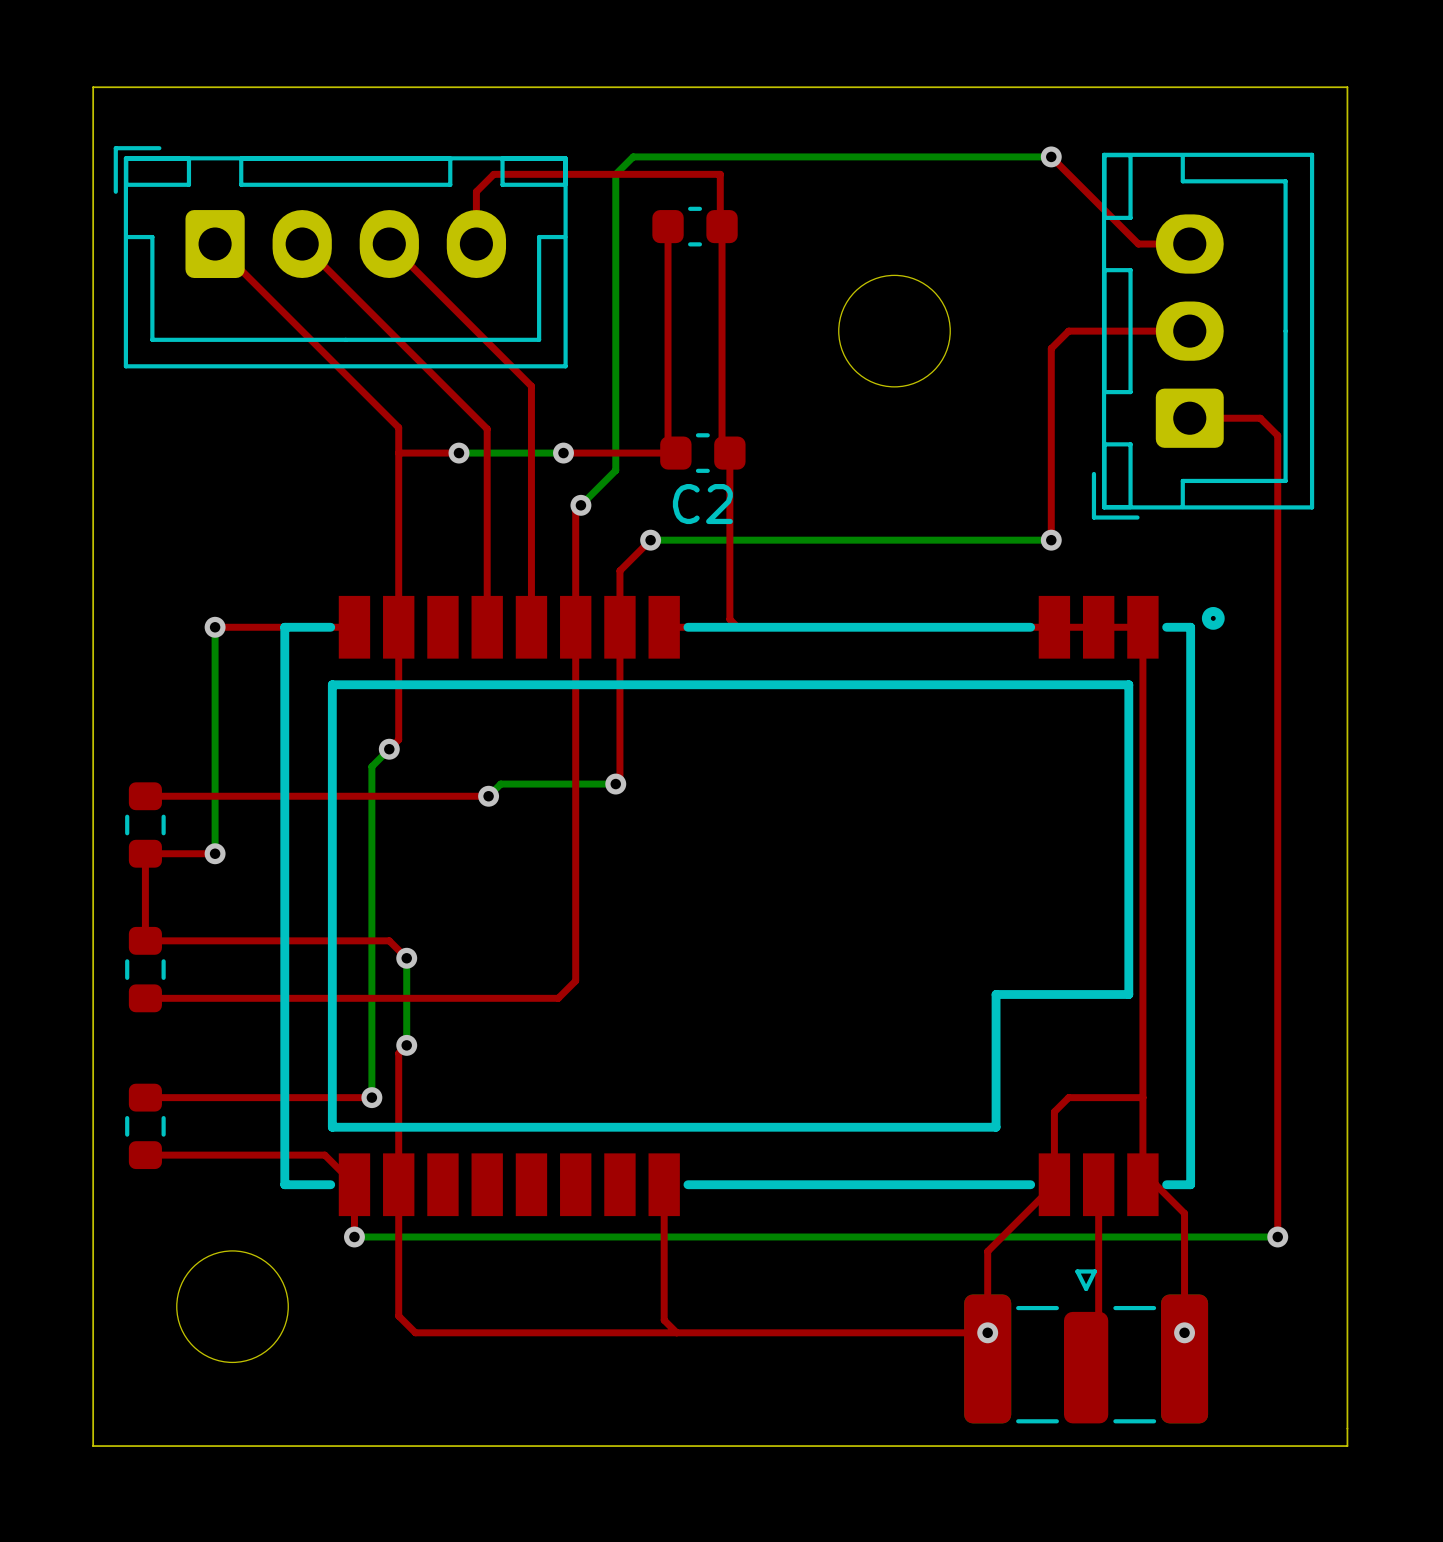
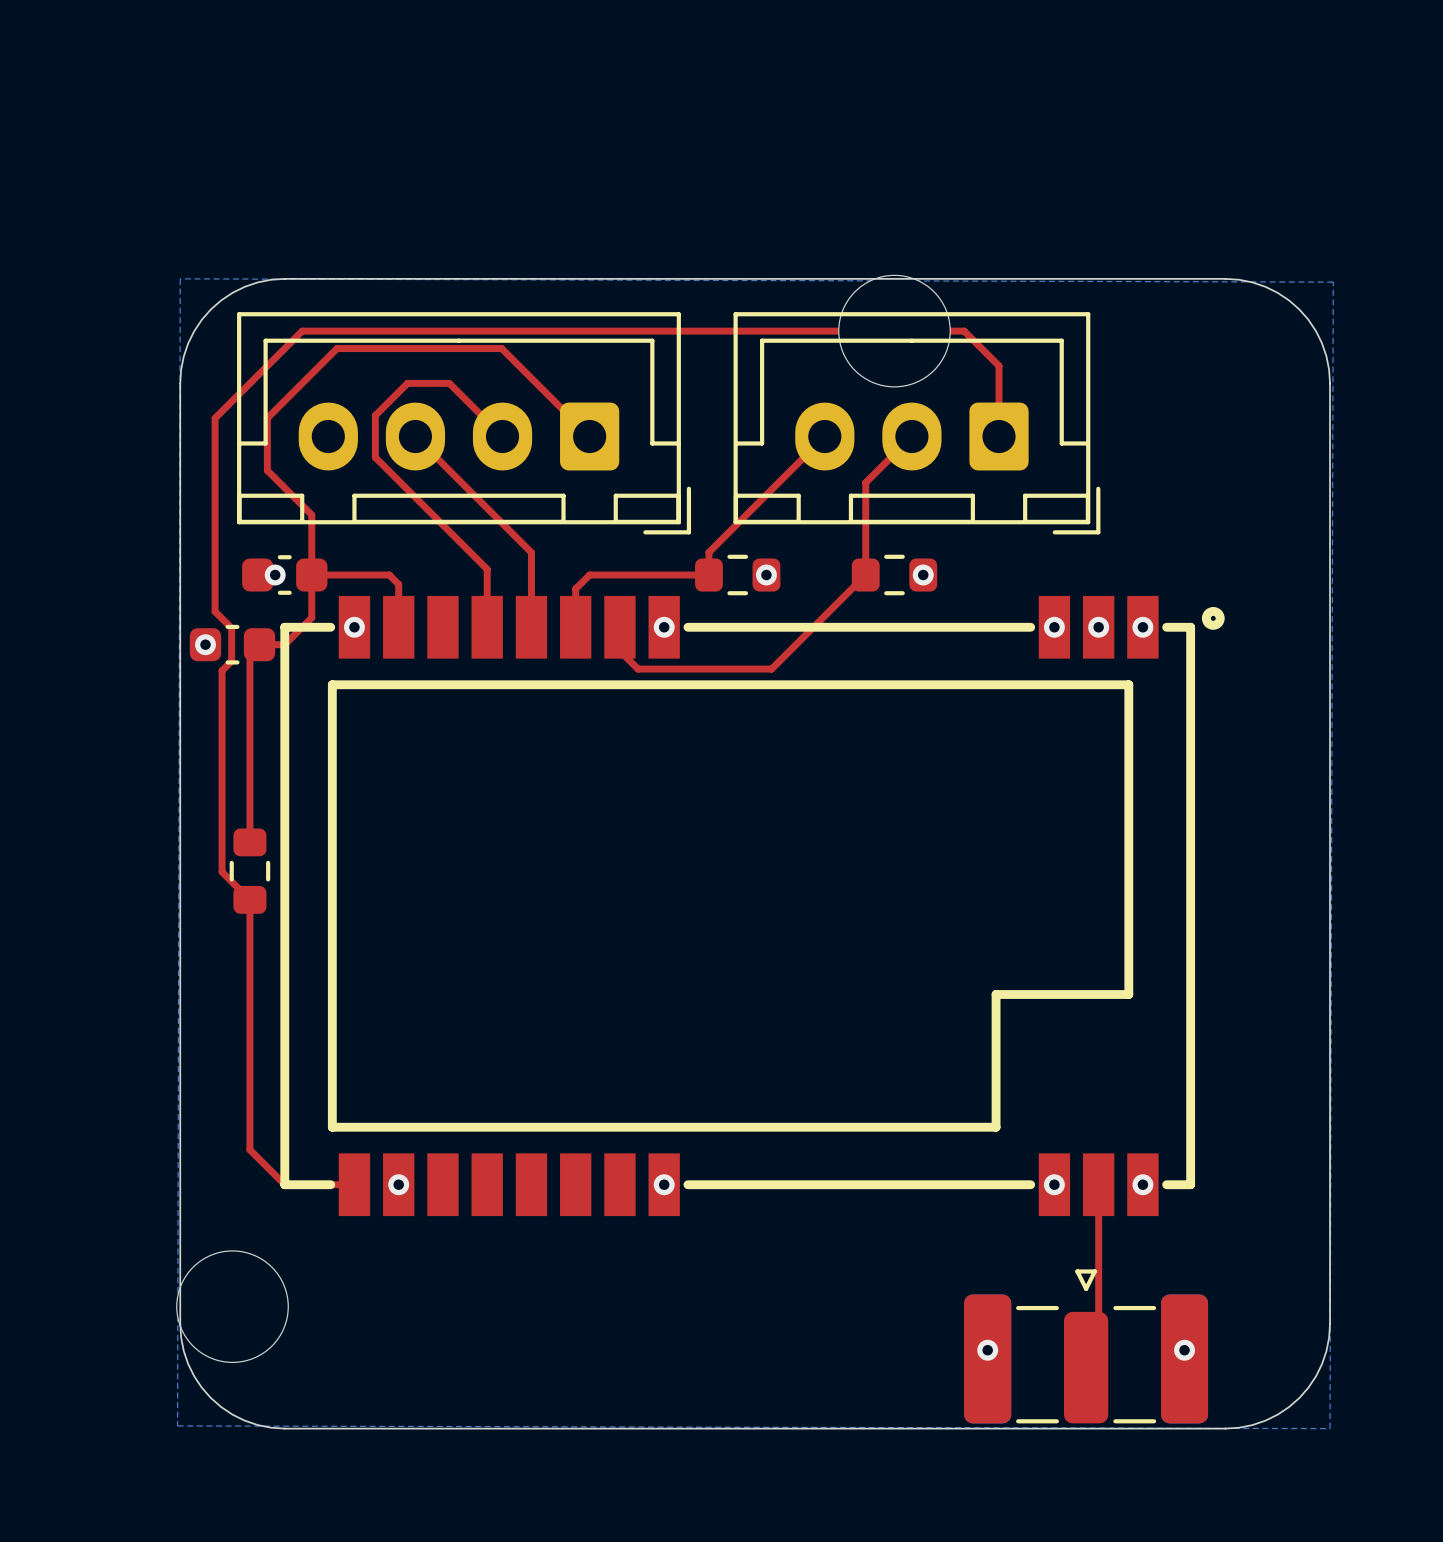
board edge: (93, 87) (1347, 87) (1347, 1446) (93, 1446) (93, 87) -> (284, 278) (257, 282) (232, 292) (221, 300) (210, 309) (194, 331) (183, 356) (181, 369) (180, 1324) (183, 1351) (188, 1364) (194, 1376) (210, 1398) (232, 1414) (244, 1420) (257, 1425) (284, 1428) (1225, 1428) (1252, 1425) (1265, 1420) (1289, 1407) (1299, 1398) (1308, 1387) (1322, 1364) (1329, 1337) (1330, 1324) (1330, 383) (1326, 356) (1322, 343) (1308, 319) (1299, 309) (1289, 300) (1265, 286) (1252, 282) (1225, 278) (284, 278)
top track: (1051, 156) (1138, 244) (1189, 244) -> none
bottom track: (1051, 156) (633, 156) (615, 174) (615, 470) (580, 505) -> none
via: (1051, 156) -> none
top track: (668, 226) (668, 445) (675, 453) (563, 453) -> none
part: (695, 226) -> none
top track: (215, 244) (398, 427) (398, 584) -> (311, 575) (389, 575) (398, 584)
top track: (302, 244) (487, 429) (487, 569) -> (502, 436) (449, 383) (407, 383) (375, 415) (375, 457) (487, 569)
top track: (389, 244) (531, 386) (531, 552) -> (415, 436) (531, 552)
top track: (476, 244) (476, 191) (493, 174) (720, 174) (722, 445) (729, 453) (729, 619) (737, 627) -> none
part rotation: 0° (340, 257) -> 180° (464, 423)
bottom zone outline: none -> (180, 278) (1333, 282) (1330, 1428) (177, 1425) (180, 278)
top track: (1189, 331) (1068, 331) (1051, 348) (1051, 540) -> none
part rotation: 0° (1203, 336) -> 90° counterclockwise (916, 423)
part position: (1203, 336) -> (916, 423)
top track: (1189, 418) (1260, 418) (1277, 435) (1277, 1236) -> none
top track: none -> (589, 436) (501, 348) (337, 348) (267, 418) (267, 470) (311, 514) (311, 617) (284, 644) (259, 644) (249, 654) (249, 842)
top track: none -> (999, 436) (999, 365) (964, 331) (302, 331) (215, 418) (215, 611) (231, 628) (231, 661) (222, 670) (222, 872) (249, 899) (249, 1149) (284, 1184) (354, 1184)
top track: (398, 453) (458, 453) -> none
bottom track: (458, 453) (563, 453) -> none
via: (458, 453) -> none
via: (563, 453) -> none
C2: (702, 453) -> none
top track: (580, 505) (575, 510) (575, 588) -> (824, 436) (708, 552) (708, 575) (589, 575) (575, 588)
via: (580, 505) -> none
top track: (650, 540) (619, 570) (619, 627) -> none
bottom track: (650, 540) (1051, 540) -> none
via: (650, 540) -> none
via: (1051, 540) -> none
via: none -> (275, 575)
part: none -> (284, 575)
part: none -> (737, 575)
via: none -> (766, 575)
part: none -> (894, 575)
via: none -> (923, 575)
top track: (215, 627) (354, 627) -> none
bottom track: (215, 627) (215, 853) -> none
via position: (215, 627) -> (205, 644)
via: none -> (354, 627)
top track: (398, 627) (398, 739) (389, 749) -> none
top track: (575, 627) (575, 980) (558, 998) (145, 998) -> none
top track: (664, 627) (1142, 627) (1142, 1184) (1155, 1184) (1184, 1213) (1184, 1332) -> none
via: none -> (664, 627)
via: none -> (1054, 627)
via: none -> (1098, 627)
via: none -> (1142, 627)
part: none -> (232, 644)
top track: (619, 650) (619, 779) (615, 784) -> (619, 650) (638, 669) (771, 669) (865, 575) (865, 482) (911, 436)
bottom track: (389, 749) (371, 766) (371, 1097) -> none
via: (389, 749) -> none
bottom track: (615, 784) (500, 784) (488, 796) -> none
via: (615, 784) -> none
top track: (145, 796) (488, 796) -> none
via: (488, 796) -> none
part: (145, 824) -> none
top track: (215, 853) (145, 853) (145, 940) (389, 940) (406, 958) -> none
via: (215, 853) -> none
part: none -> (249, 871)
bottom track: (406, 958) (406, 1045) -> none
via: (406, 958) -> none
part: (145, 969) -> none
top track: (406, 1045) (398, 1053) (398, 1316) (415, 1332) (987, 1332) -> none
via: (406, 1045) -> none
top track: (145, 1097) (371, 1097) -> none
via: (371, 1097) -> none
top track: (1142, 1097) (1068, 1097) (1054, 1111) (1054, 1184) (987, 1251) (987, 1358) -> none
part: (145, 1126) -> none
top track: (145, 1155) (324, 1155) (354, 1184) (354, 1236) -> none
via: none -> (398, 1184)
top track: (664, 1184) (664, 1320) (676, 1332) -> none
via: none -> (664, 1184)
via: none -> (1054, 1184)
via: none -> (1142, 1184)
bottom track: (354, 1236) (1277, 1236) -> none
via: (354, 1236) -> none
via: (1277, 1236) -> none
via position: (987, 1332) -> (987, 1350)
via position: (1184, 1332) -> (1184, 1350)

